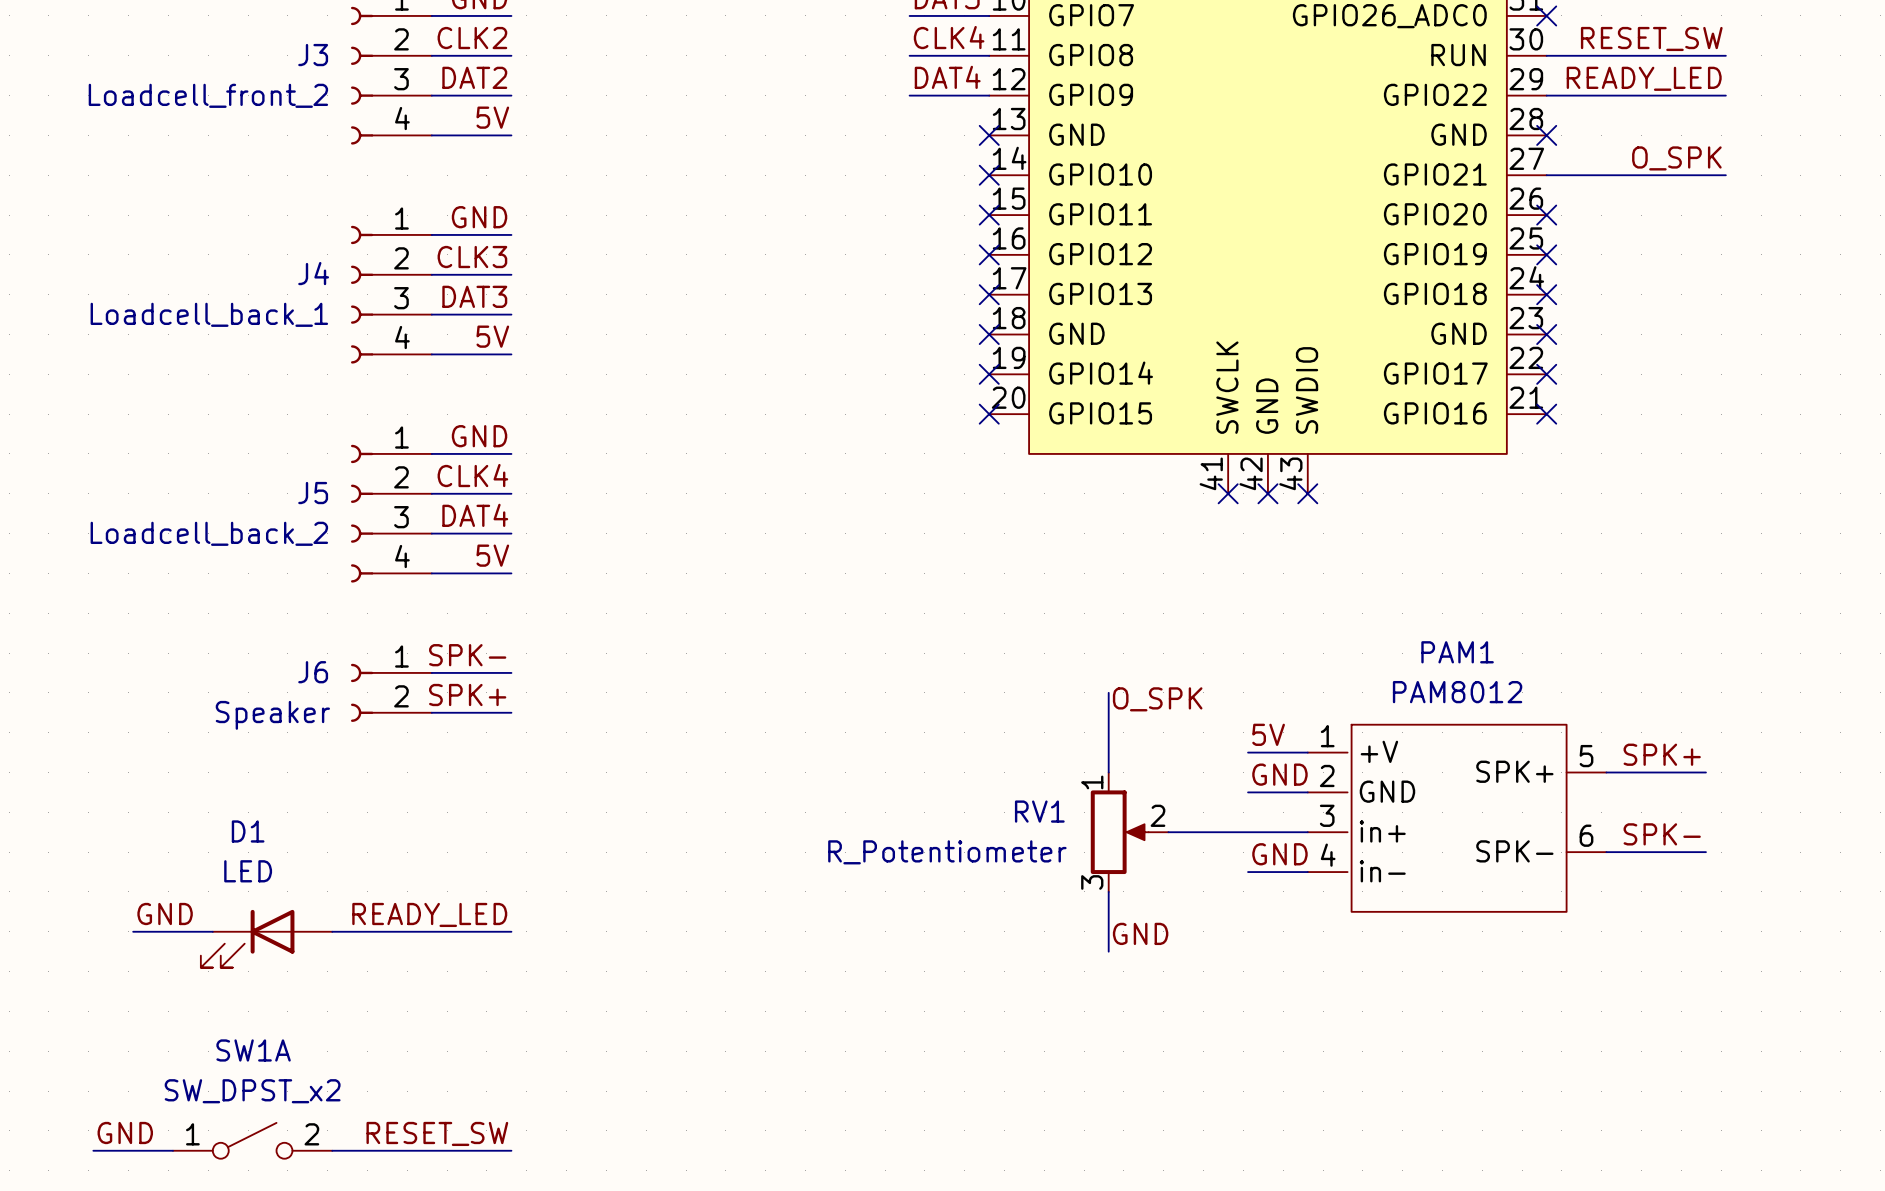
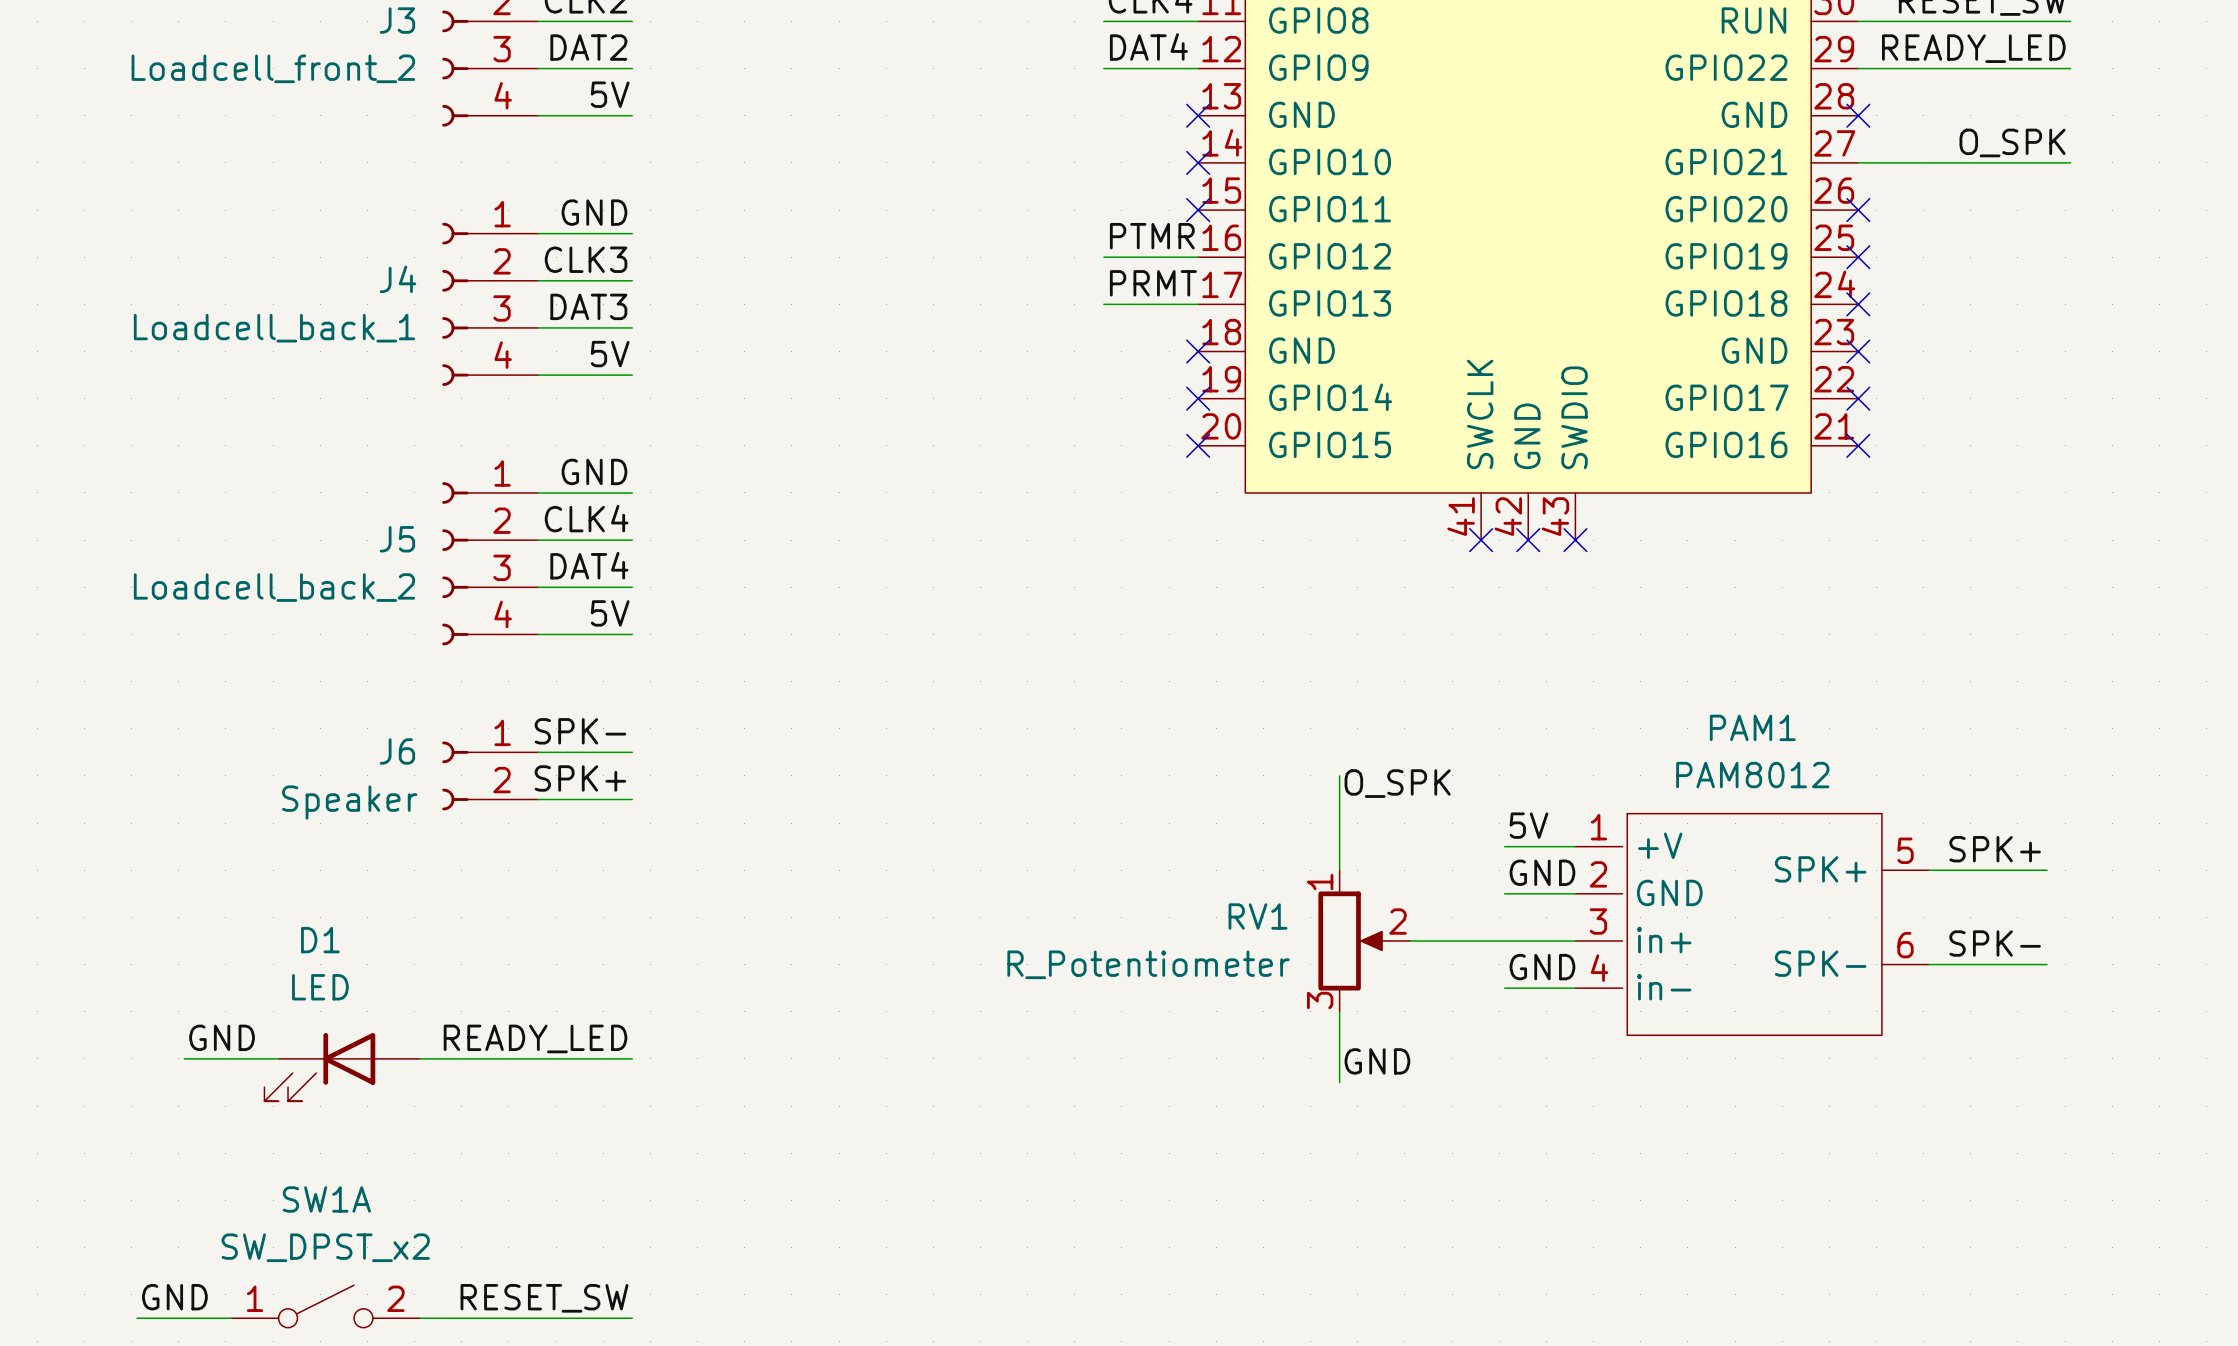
label: none -> PTMR (1152, 236)
wire: none -> (1103, 257) (1198, 257)
no-connect mark: (989, 254) -> none
label: none -> PRMT (1153, 283)
wire: none -> (1103, 304) (1198, 304)
no-connect mark: (989, 294) -> none

